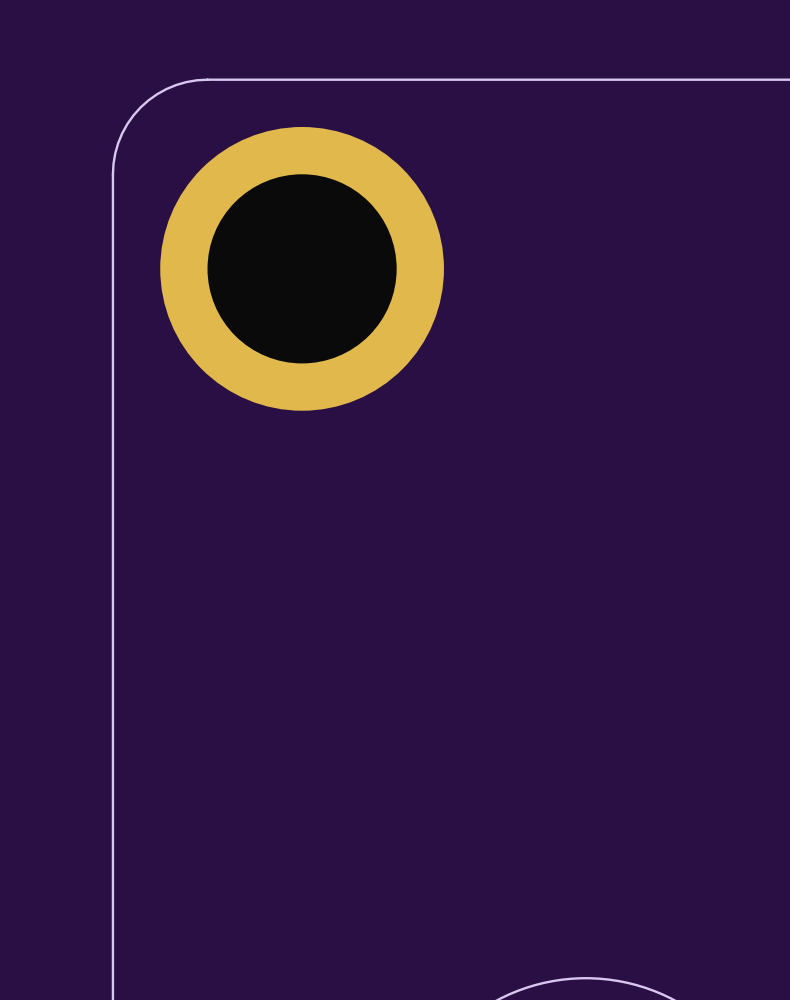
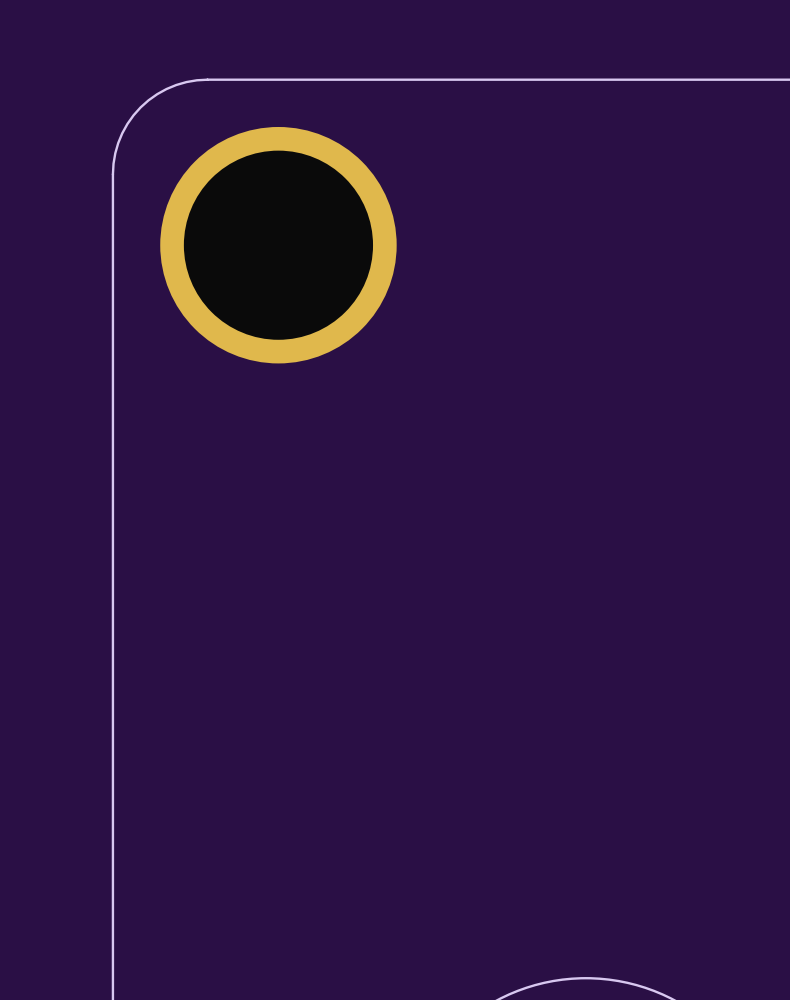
part footprint: [160, 126, 444, 411] -> [160, 126, 397, 364]

